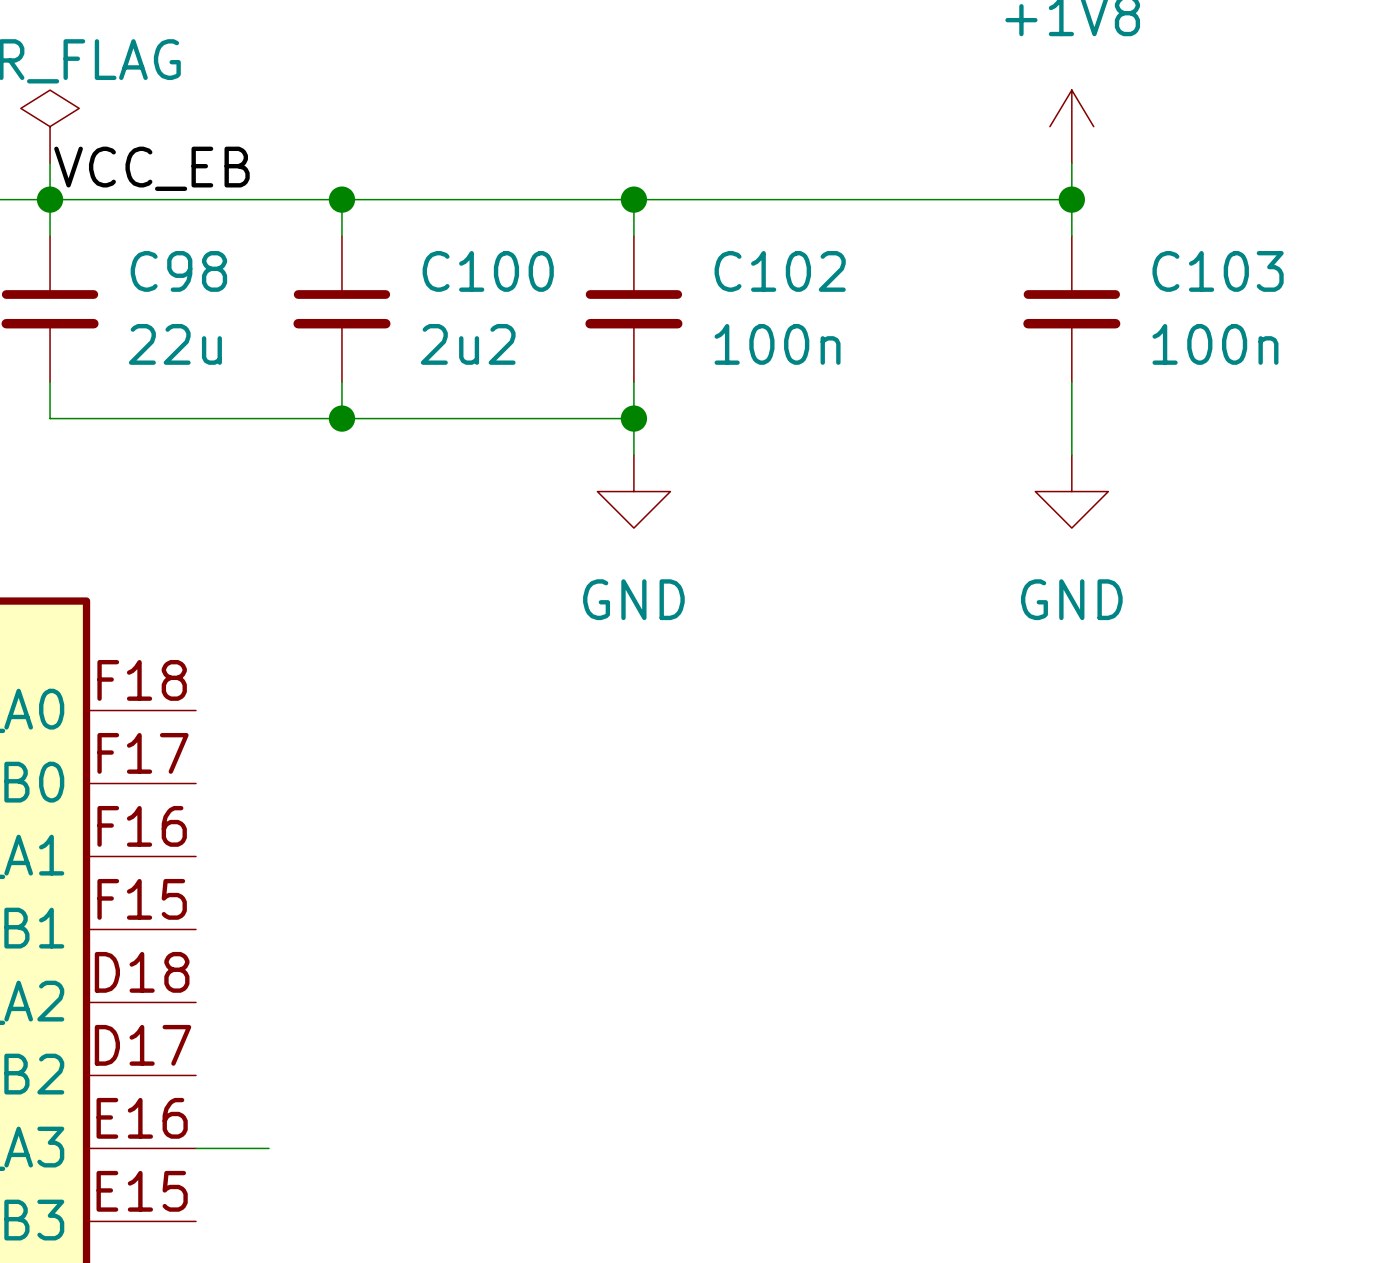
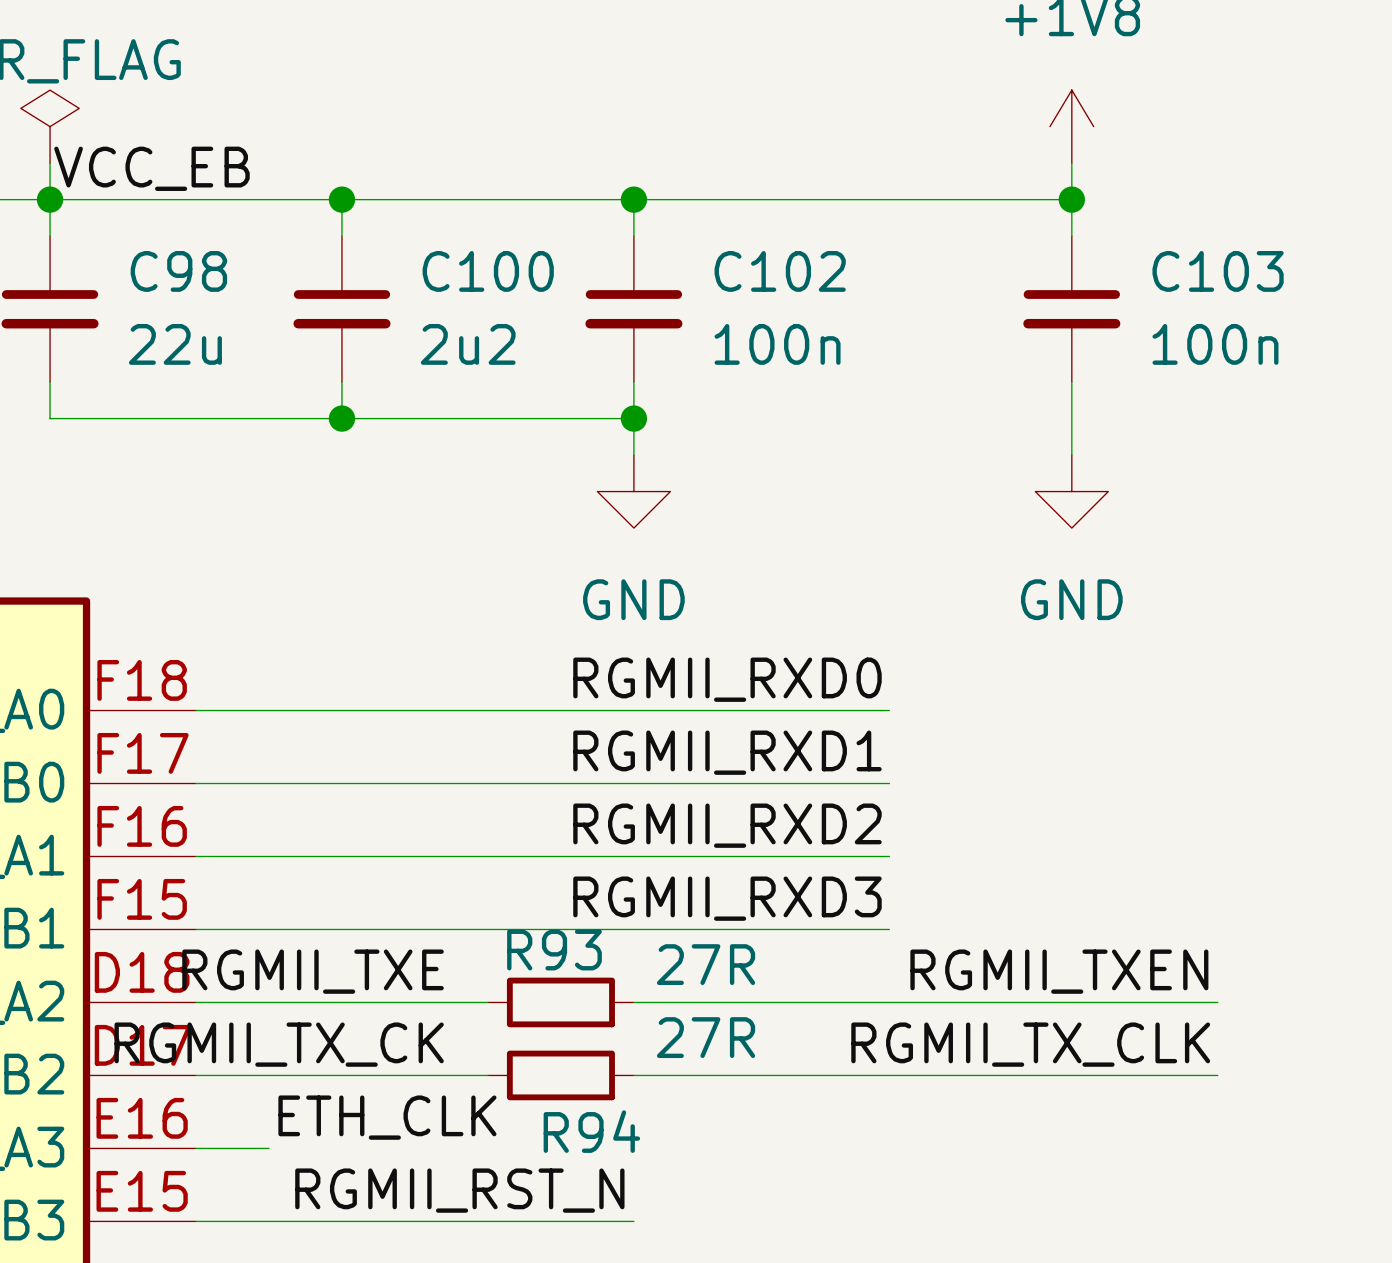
label: none -> RGMII_RXD0 (727, 679)
wire: none -> (196, 710) (889, 710)
label: none -> RGMII_RXD1 (727, 752)
wire: none -> (196, 783) (889, 783)
label: none -> RGMII_RXD2 (727, 825)
wire: none -> (196, 856) (889, 856)
label: none -> RGMII_RXD3 (727, 898)
wire: none -> (196, 929) (889, 929)
label: none -> RGMII_TXE (313, 971)
label: none -> RGMII_TXEN (1059, 971)
wire: none -> (196, 1002) (487, 1002)
R93: none -> 27R (560, 1002)
wire: none -> (633, 1002) (1217, 1002)
label: none -> RGMII_TX_CK (279, 1044)
label: none -> RGMII_TX_CLK (1030, 1044)
wire: none -> (196, 1075) (487, 1075)
R94: none -> 27R (560, 1075)
wire: none -> (633, 1075) (1217, 1075)
label: none -> ETH_CLK (387, 1117)
label: none -> RGMII_RST_N (459, 1190)
wire: none -> (196, 1221) (633, 1221)

